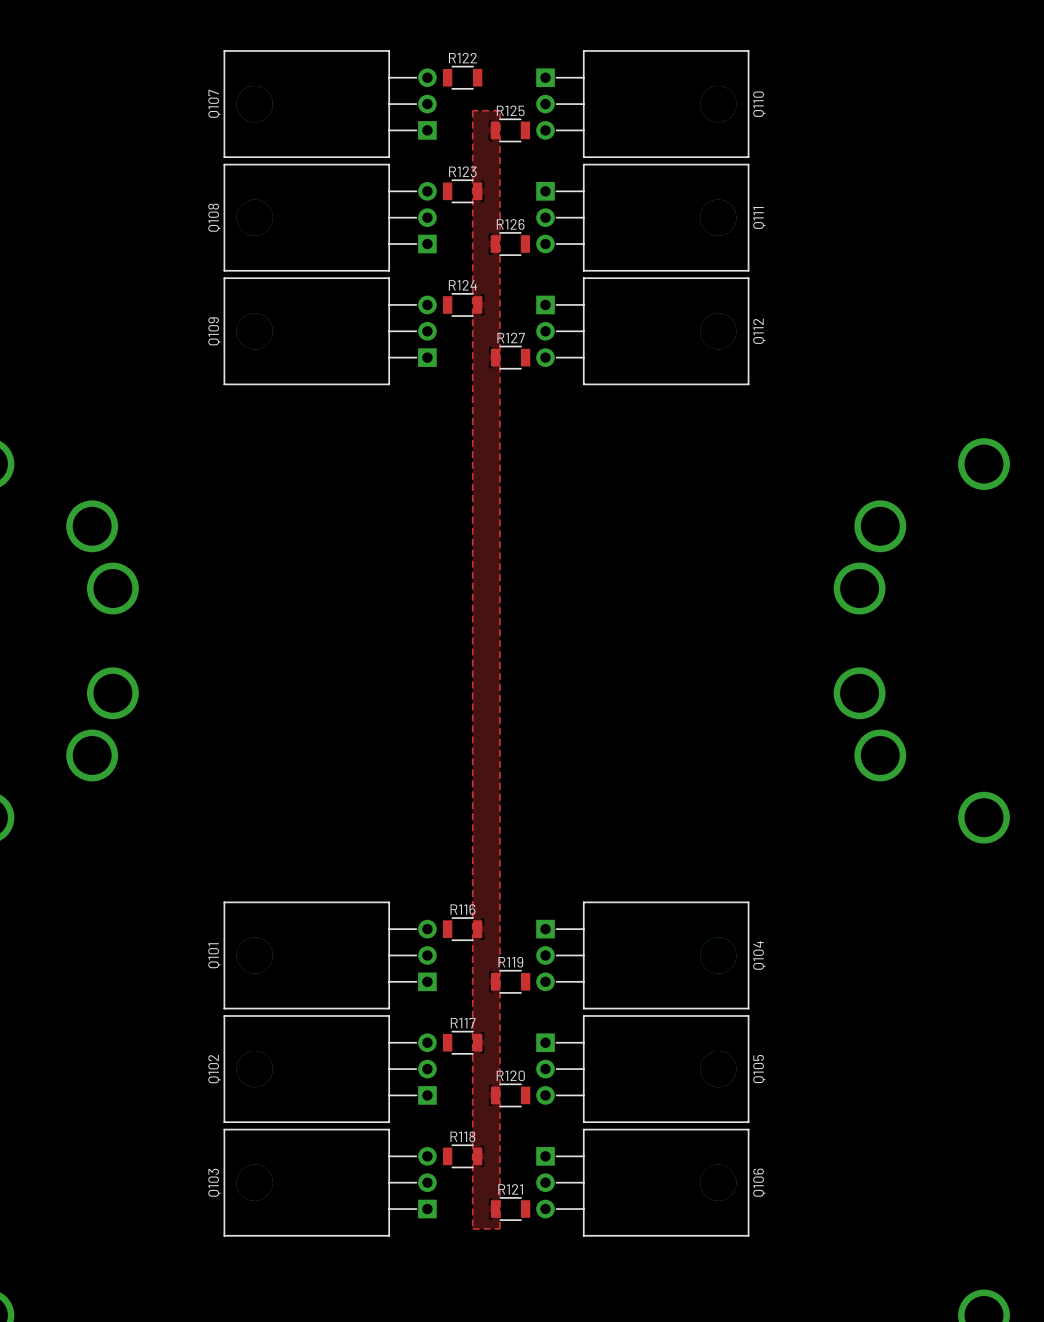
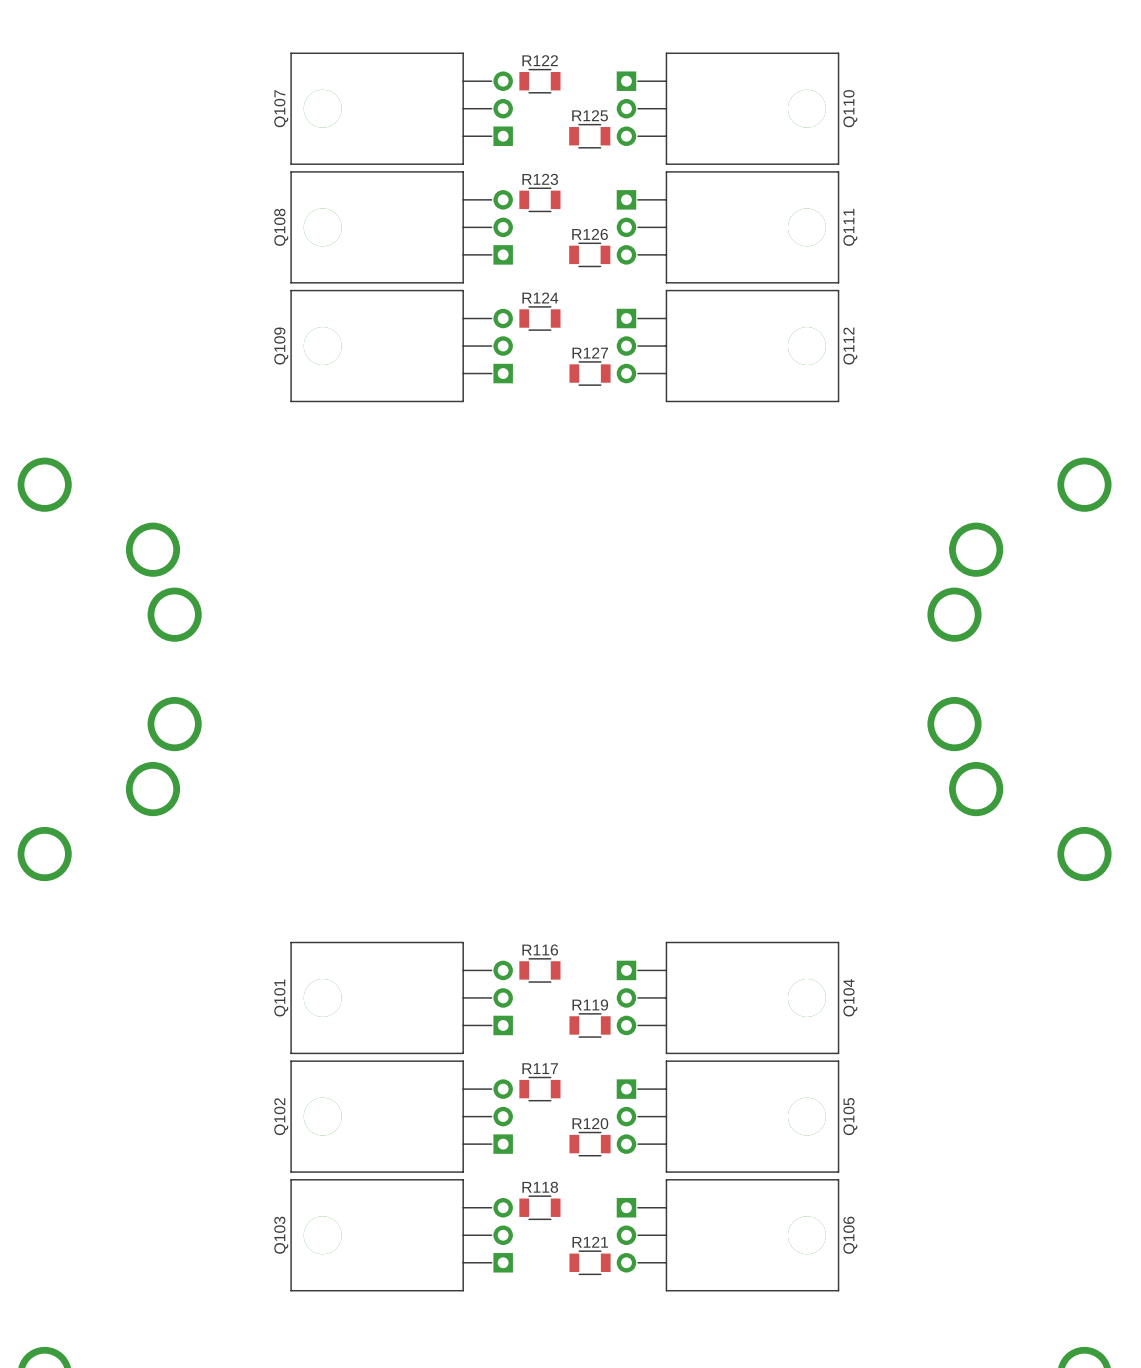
top zone outline: (472, 110) (499, 110) (499, 1228) (472, 1228) (472, 110) -> none

